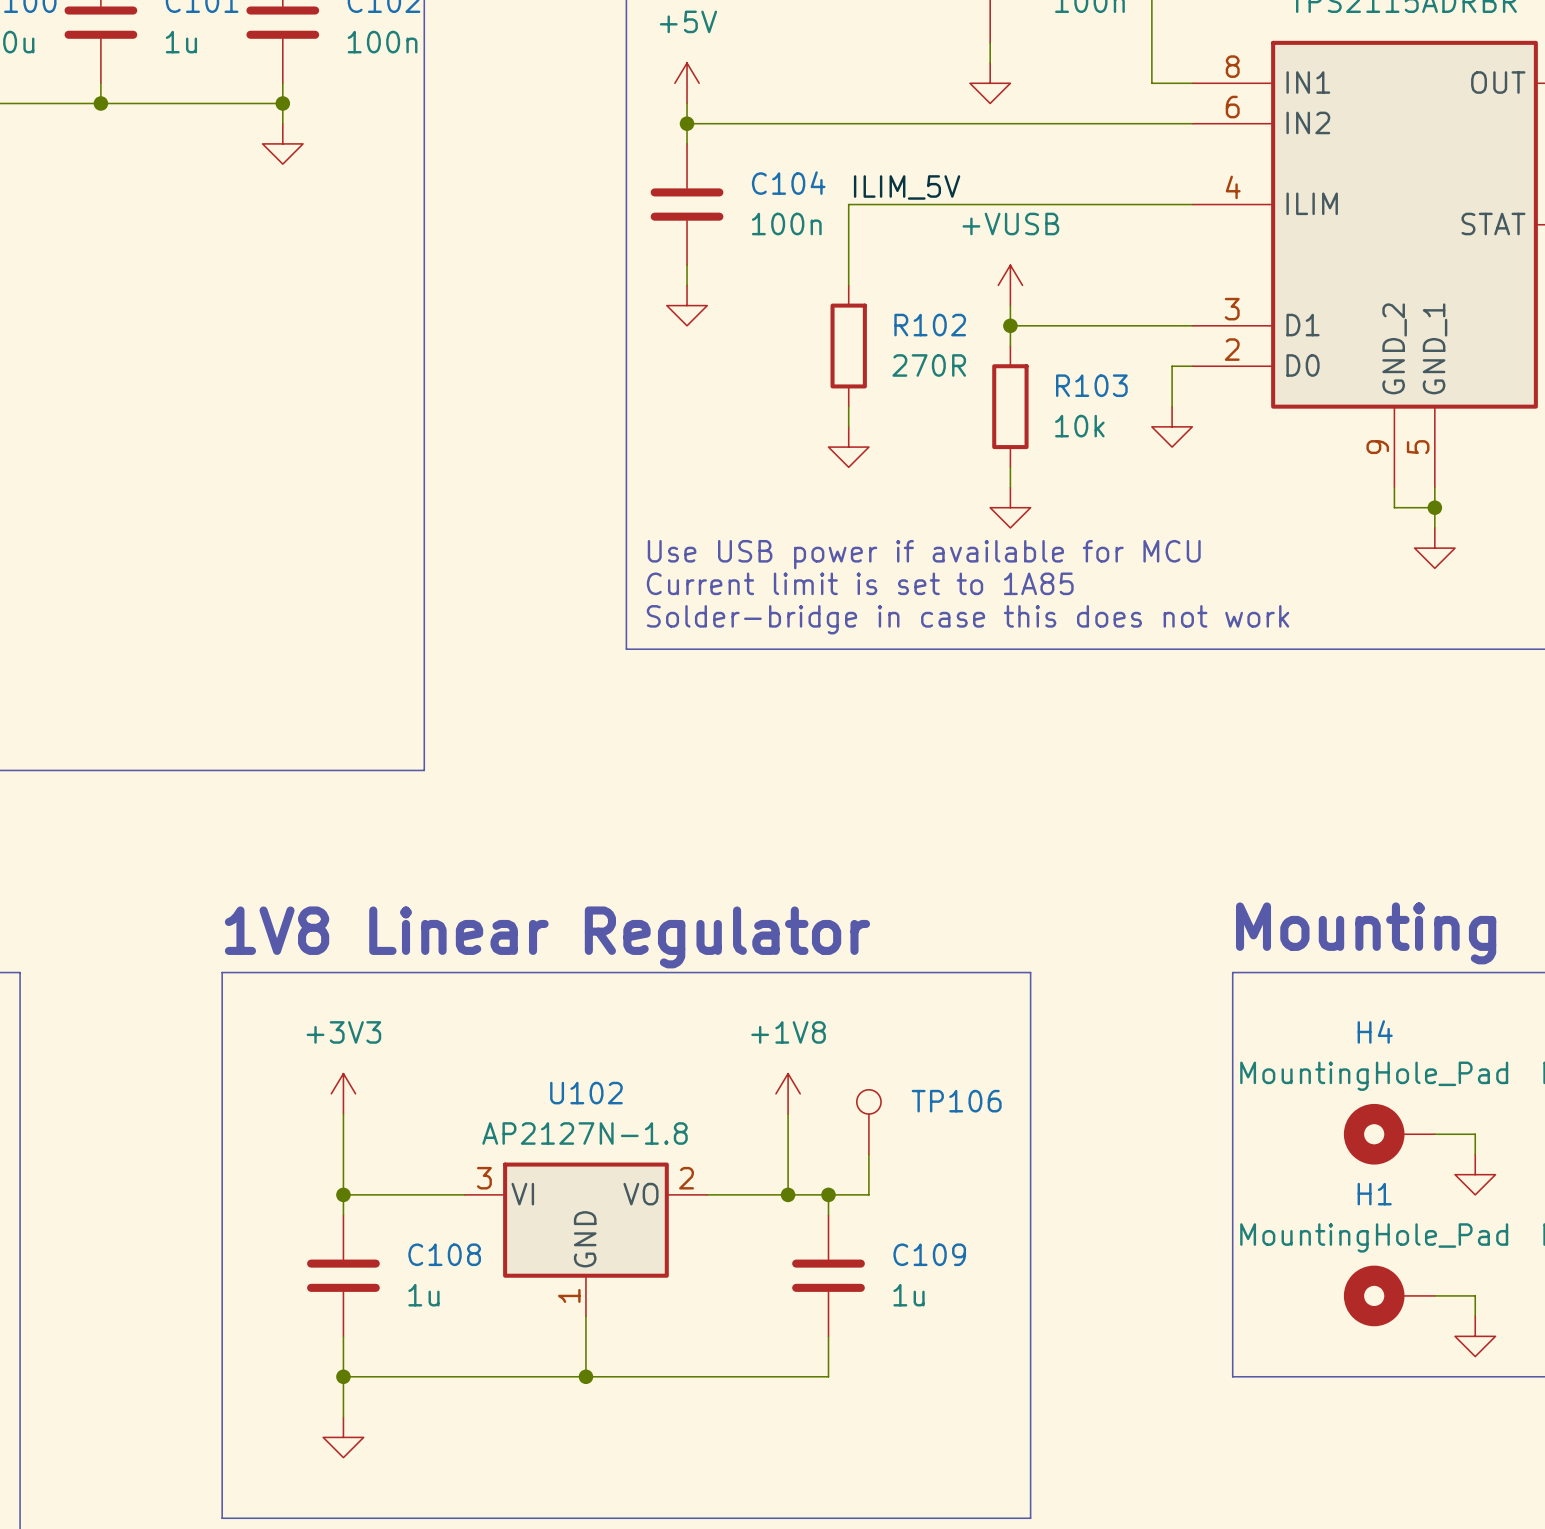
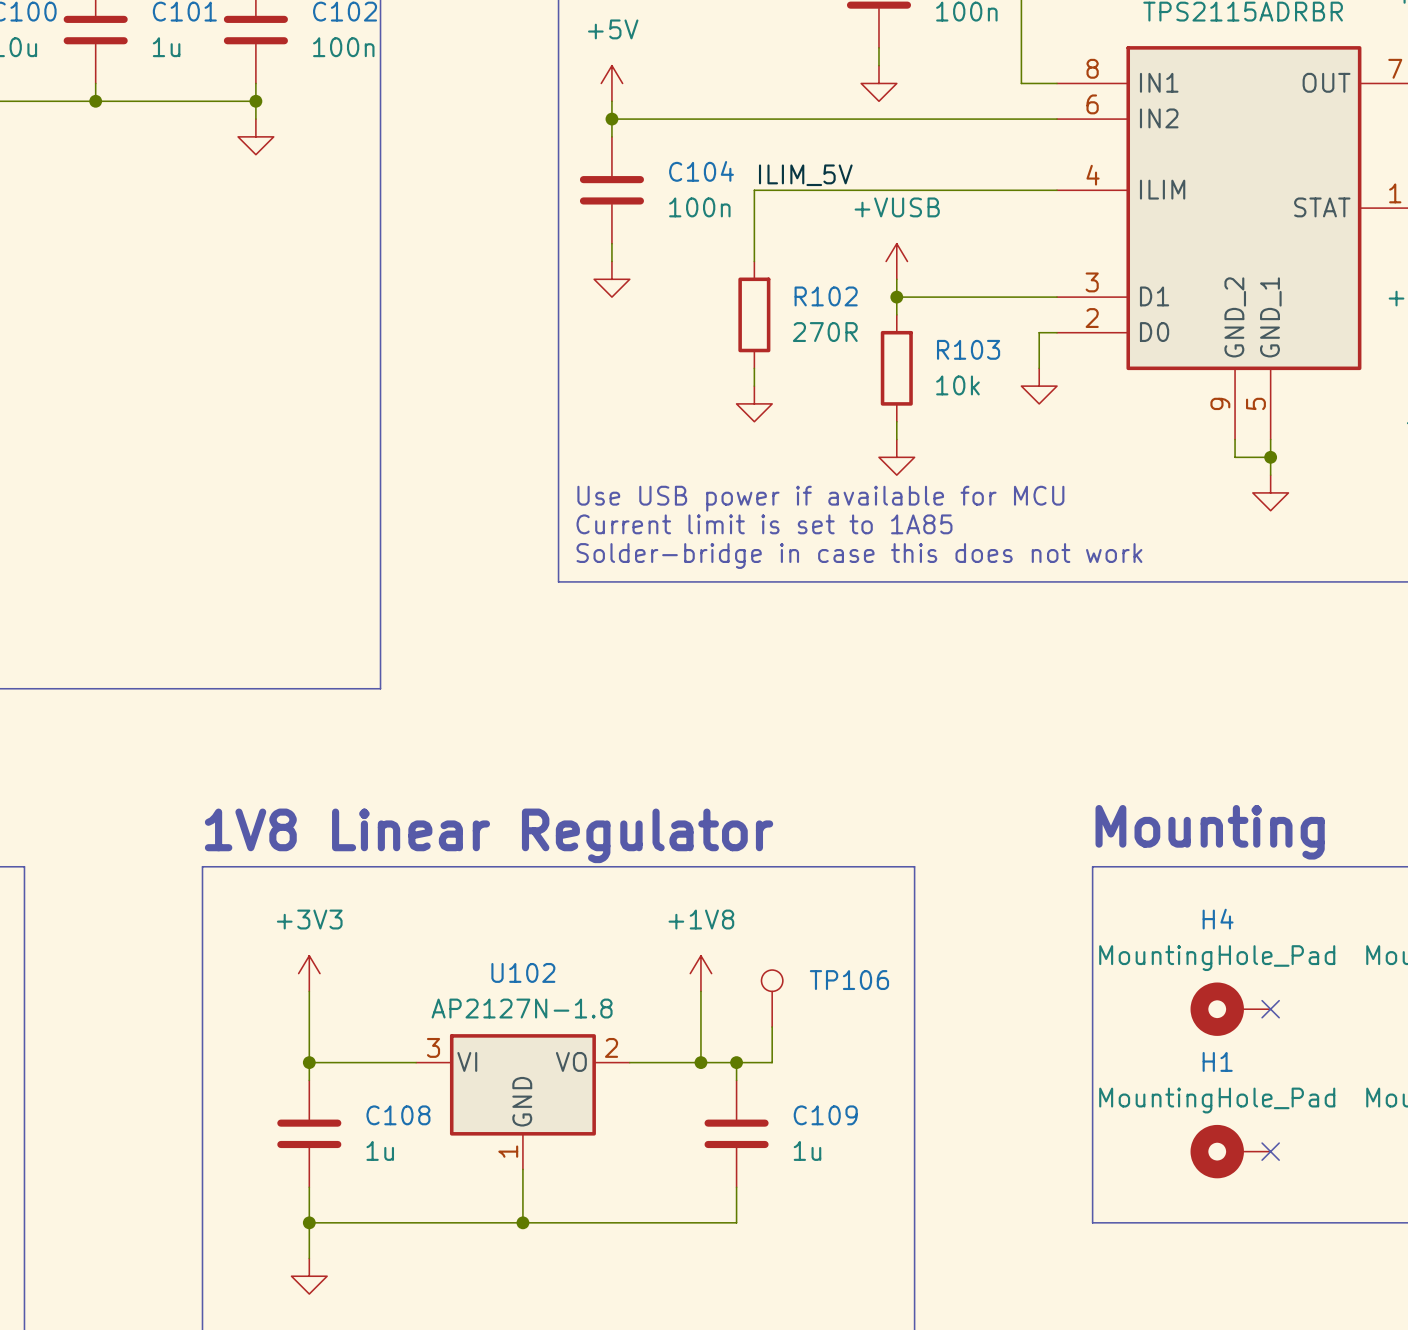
wire: (1434, 1134) (1475, 1134) (1475, 1154) -> none
no-connect mark: none -> (1270, 1009)
power symbol: (1475, 1174) -> none
wire: (1434, 1295) (1475, 1295) (1475, 1316) -> none
no-connect mark: none -> (1270, 1151)
power symbol: (1475, 1336) -> none

